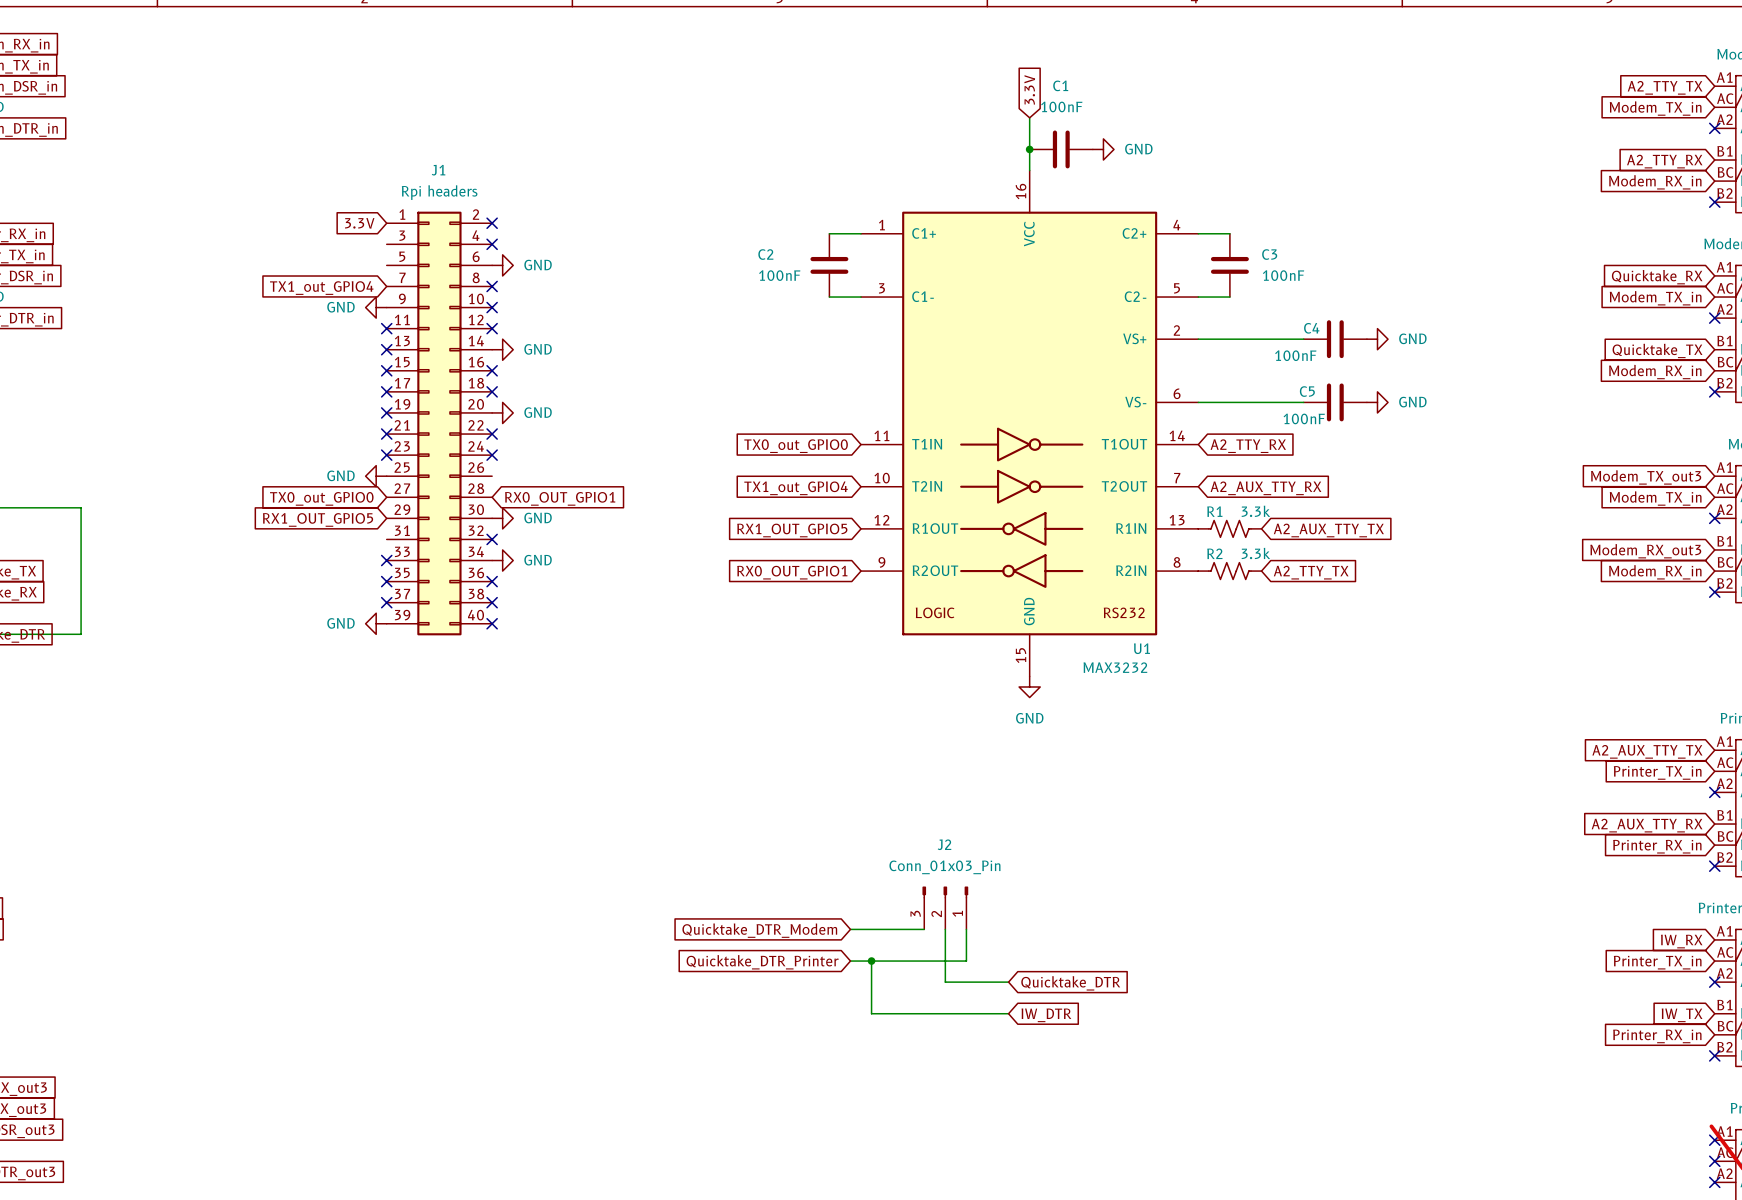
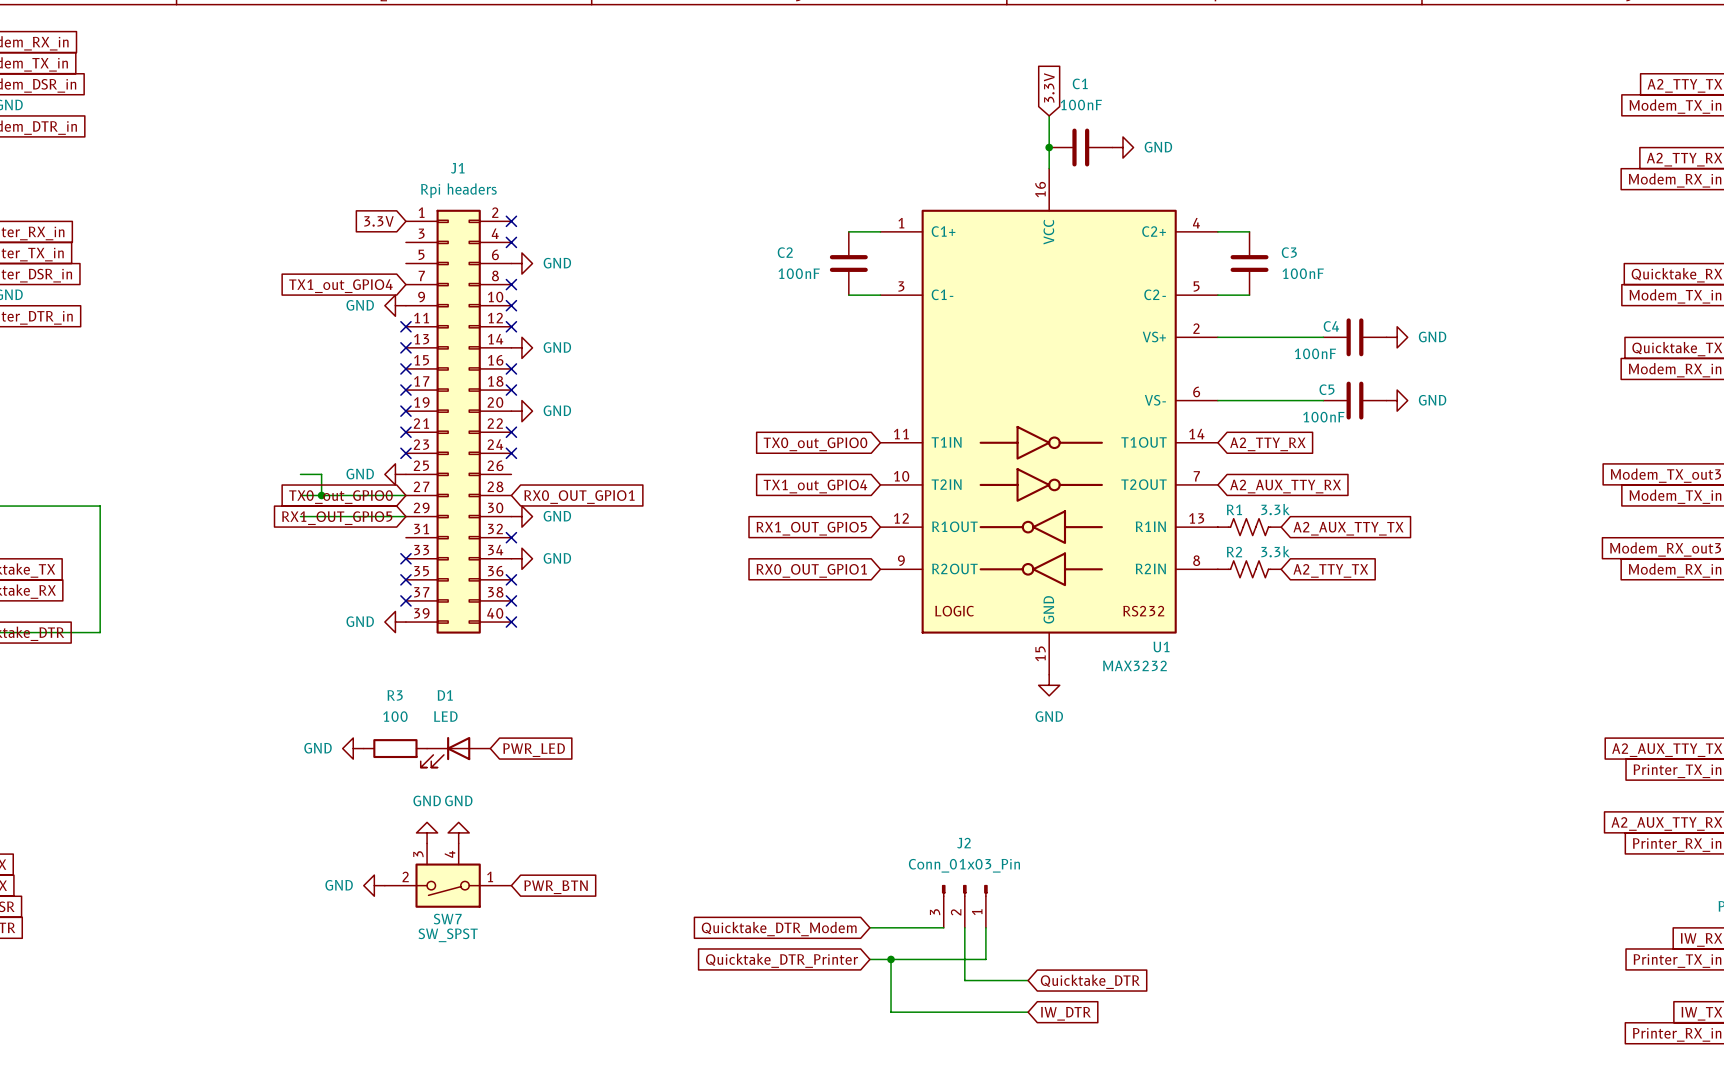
wire: none -> (300, 474) (321, 474) (321, 495)
wire: none -> (300, 495) (405, 495)
junction: none -> (321, 495)
wire: none -> (300, 516) (405, 516)
power symbol: none -> GND (353, 748)
R3: none -> 100 (395, 748)
global label: none -> PWR_LED (534, 750)
D1: none -> LED (455, 752)
power symbol: none -> GND (427, 832)
power symbol: none -> GND (458, 832)
SW7: none -> SW_SPST (448, 875)
power symbol: none -> GND (374, 885)
global label: none -> PWR_BTN (556, 887)

